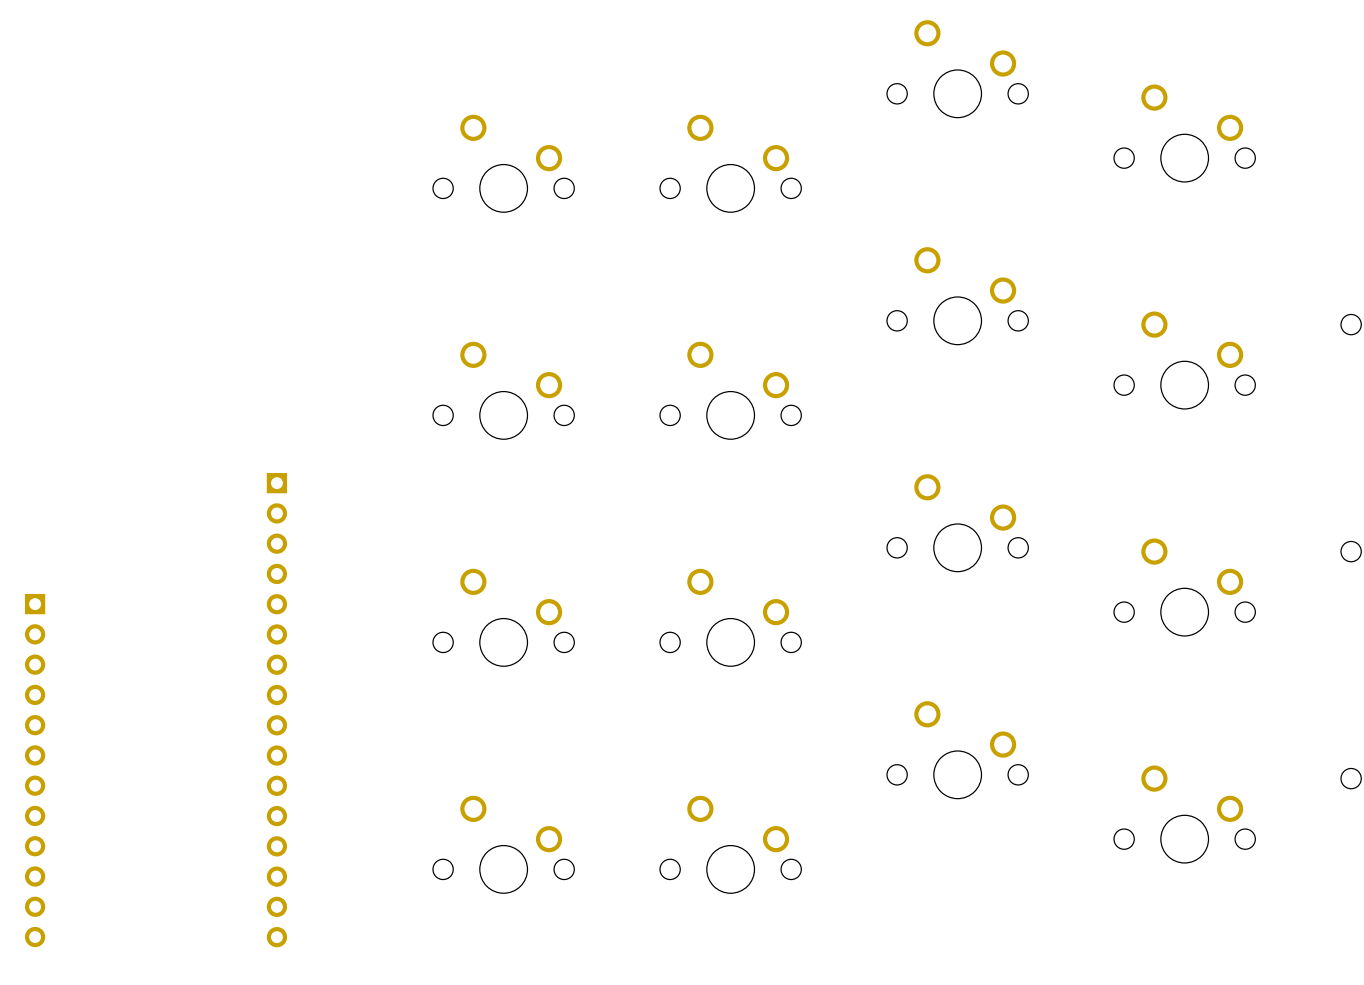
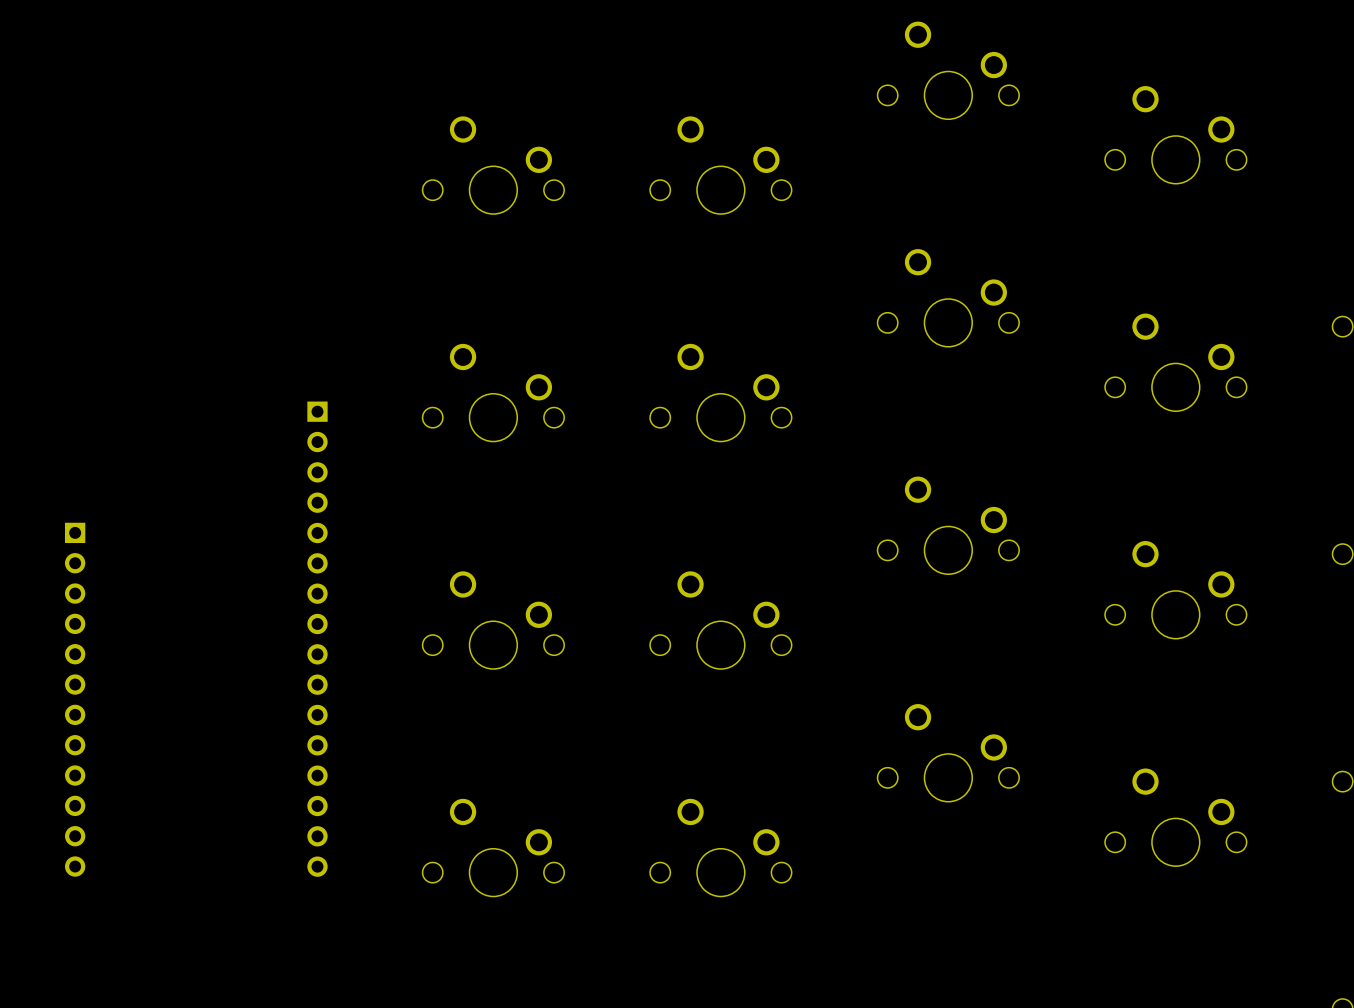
part position: (276, 710) -> (317, 639)
part position: (35, 770) -> (75, 699)

